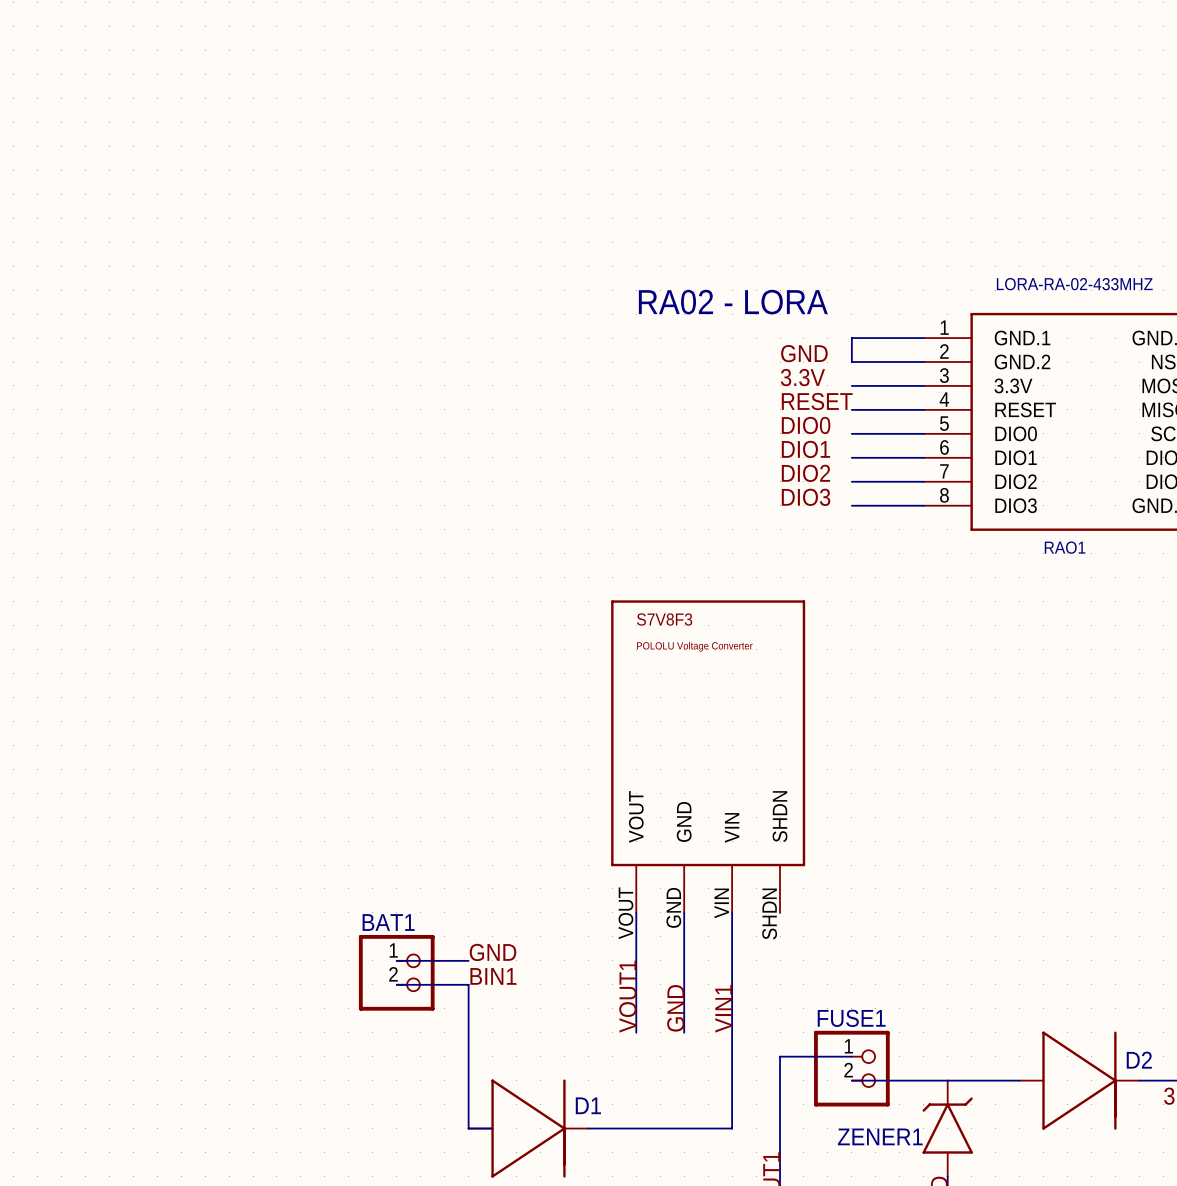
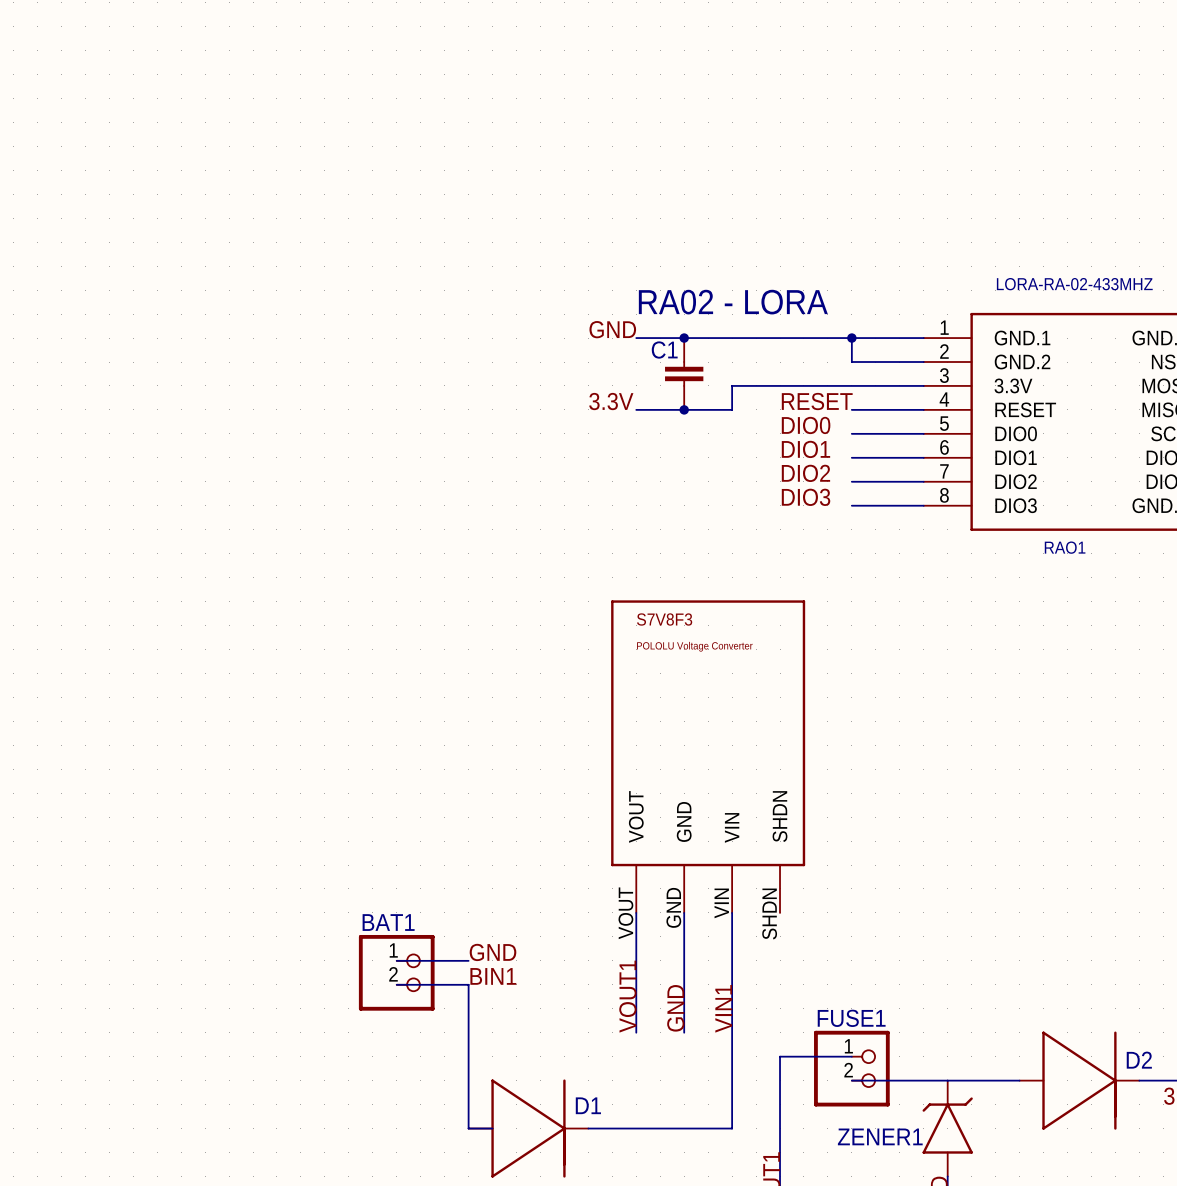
wire: none -> (636, 338) (851, 338)
junction: none -> (684, 338)
junction: none -> (851, 338)
label position: GND (804, 353) -> GND (612, 329)
C1: none -> (684, 373)
label position: 3.3V (802, 377) -> 3.3V (611, 401)
wire: none -> (851, 385) (732, 385) (732, 409) (636, 409)
junction: none -> (684, 409)

